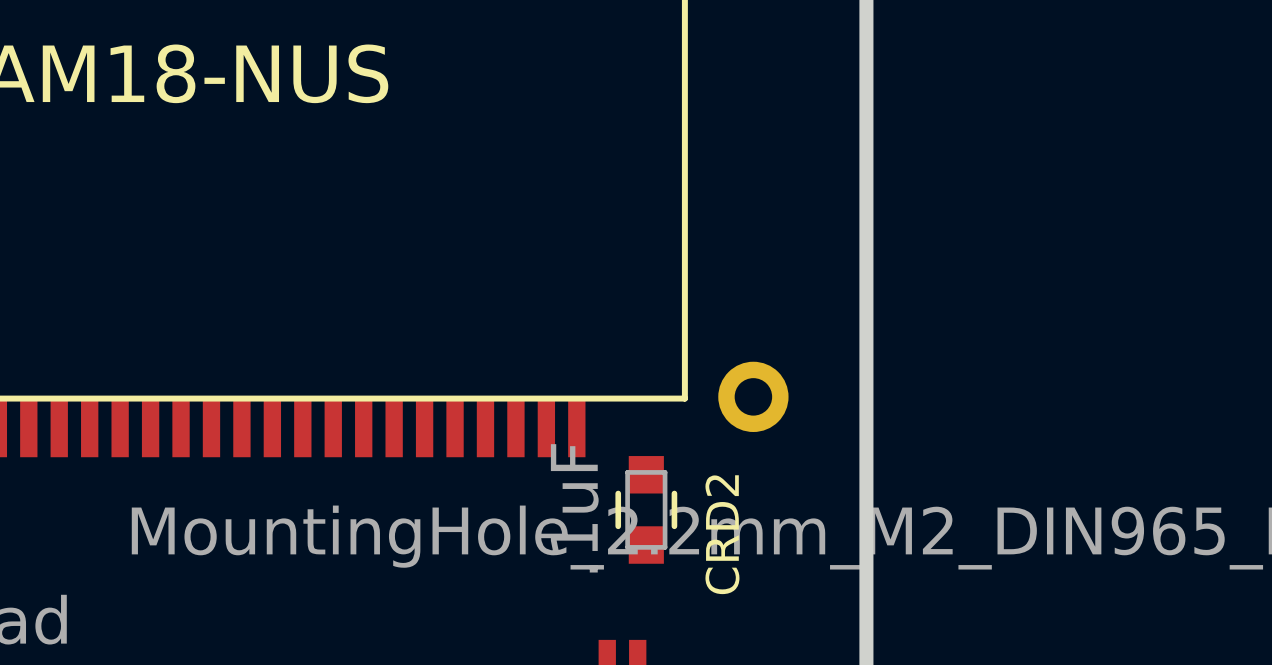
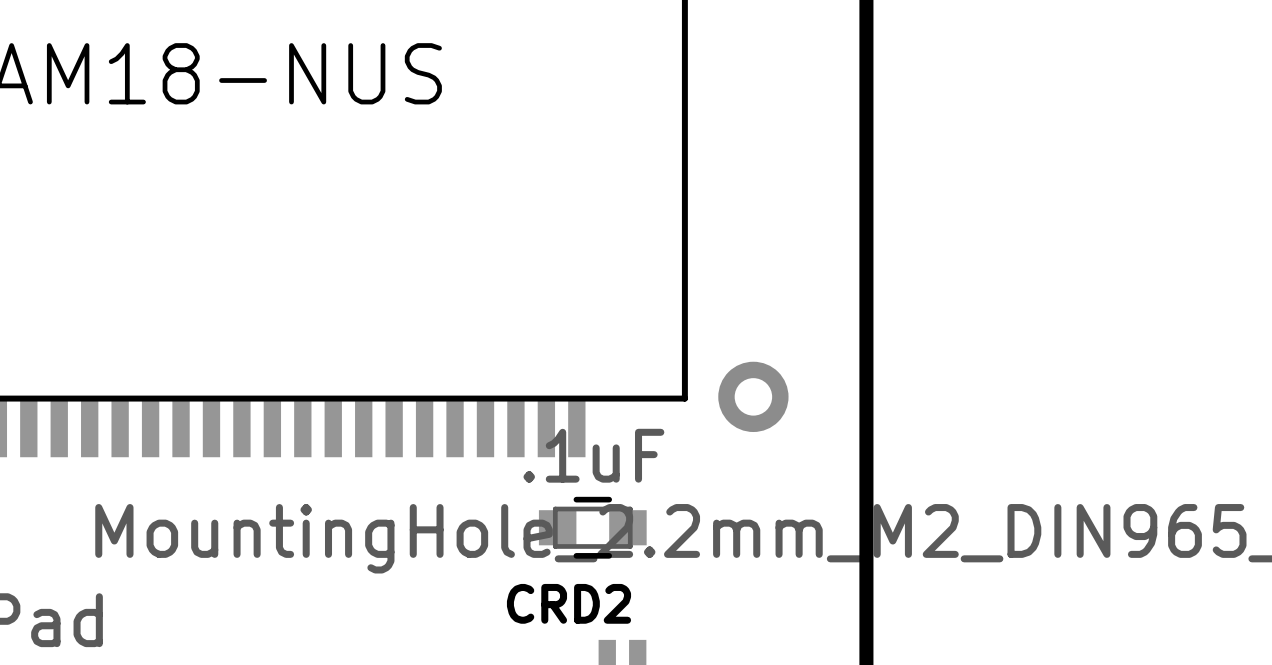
CRD2 rotation: 0° (646, 509) -> 90° clockwise (592, 527)

